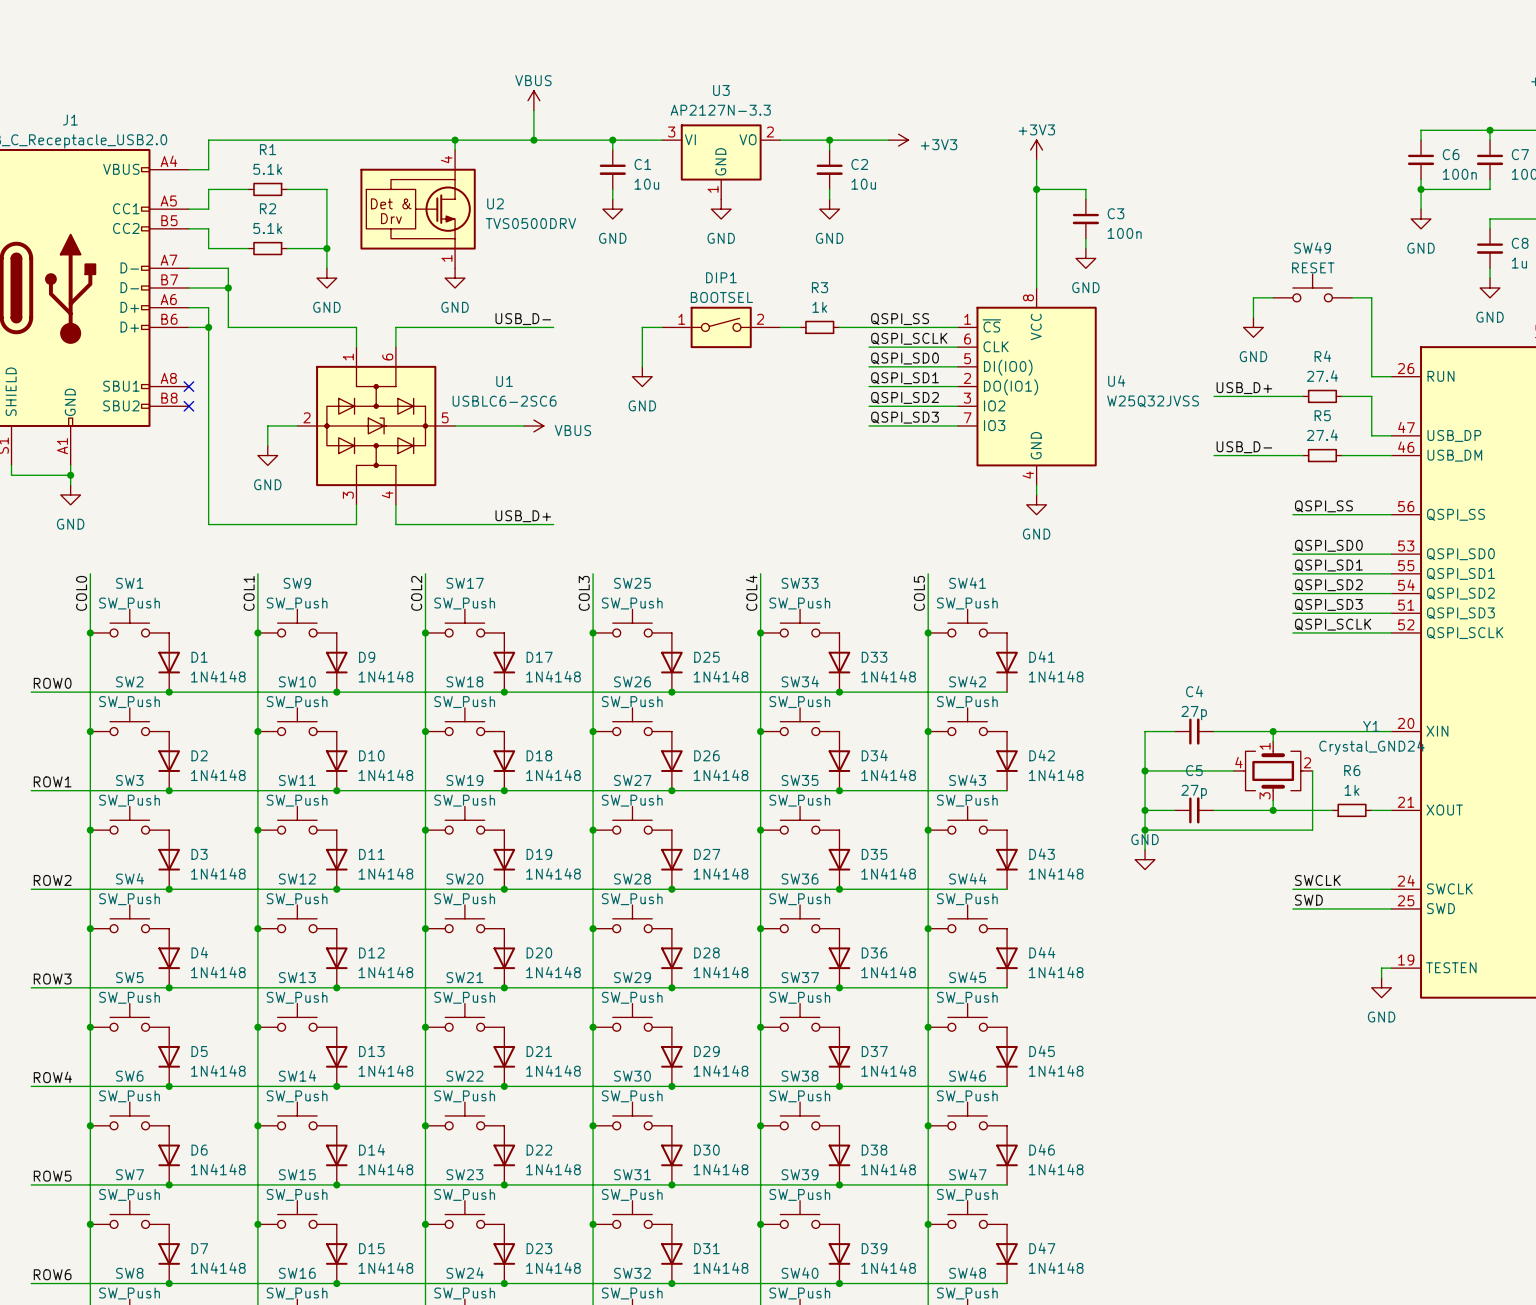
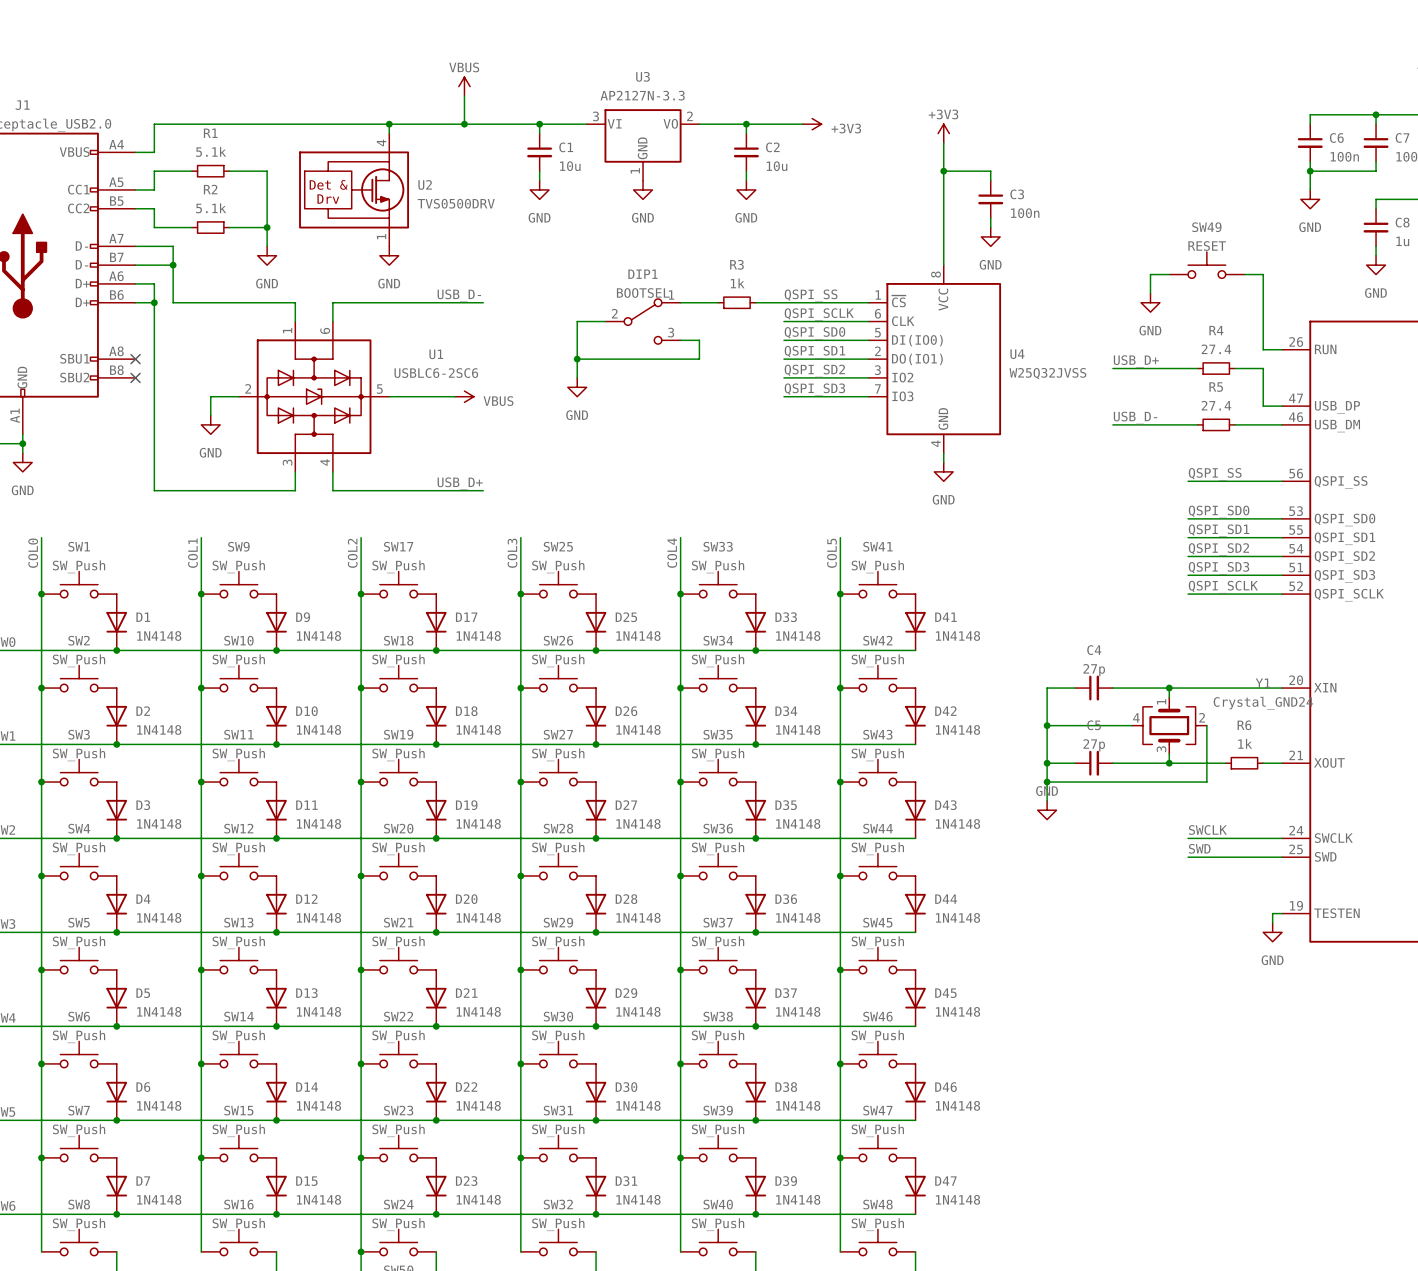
DIP1 symbol: [662, 306, 781, 349] -> [605, 298, 681, 345]
wire: (662, 327) (642, 327) (642, 366) -> none
wire: none -> (605, 321) (577, 321) (577, 377)
wire: none -> (680, 340) (699, 340) (699, 359) (577, 359)
power symbol position: GND (642, 376) -> GND (577, 387)
junction: none -> (577, 359)

